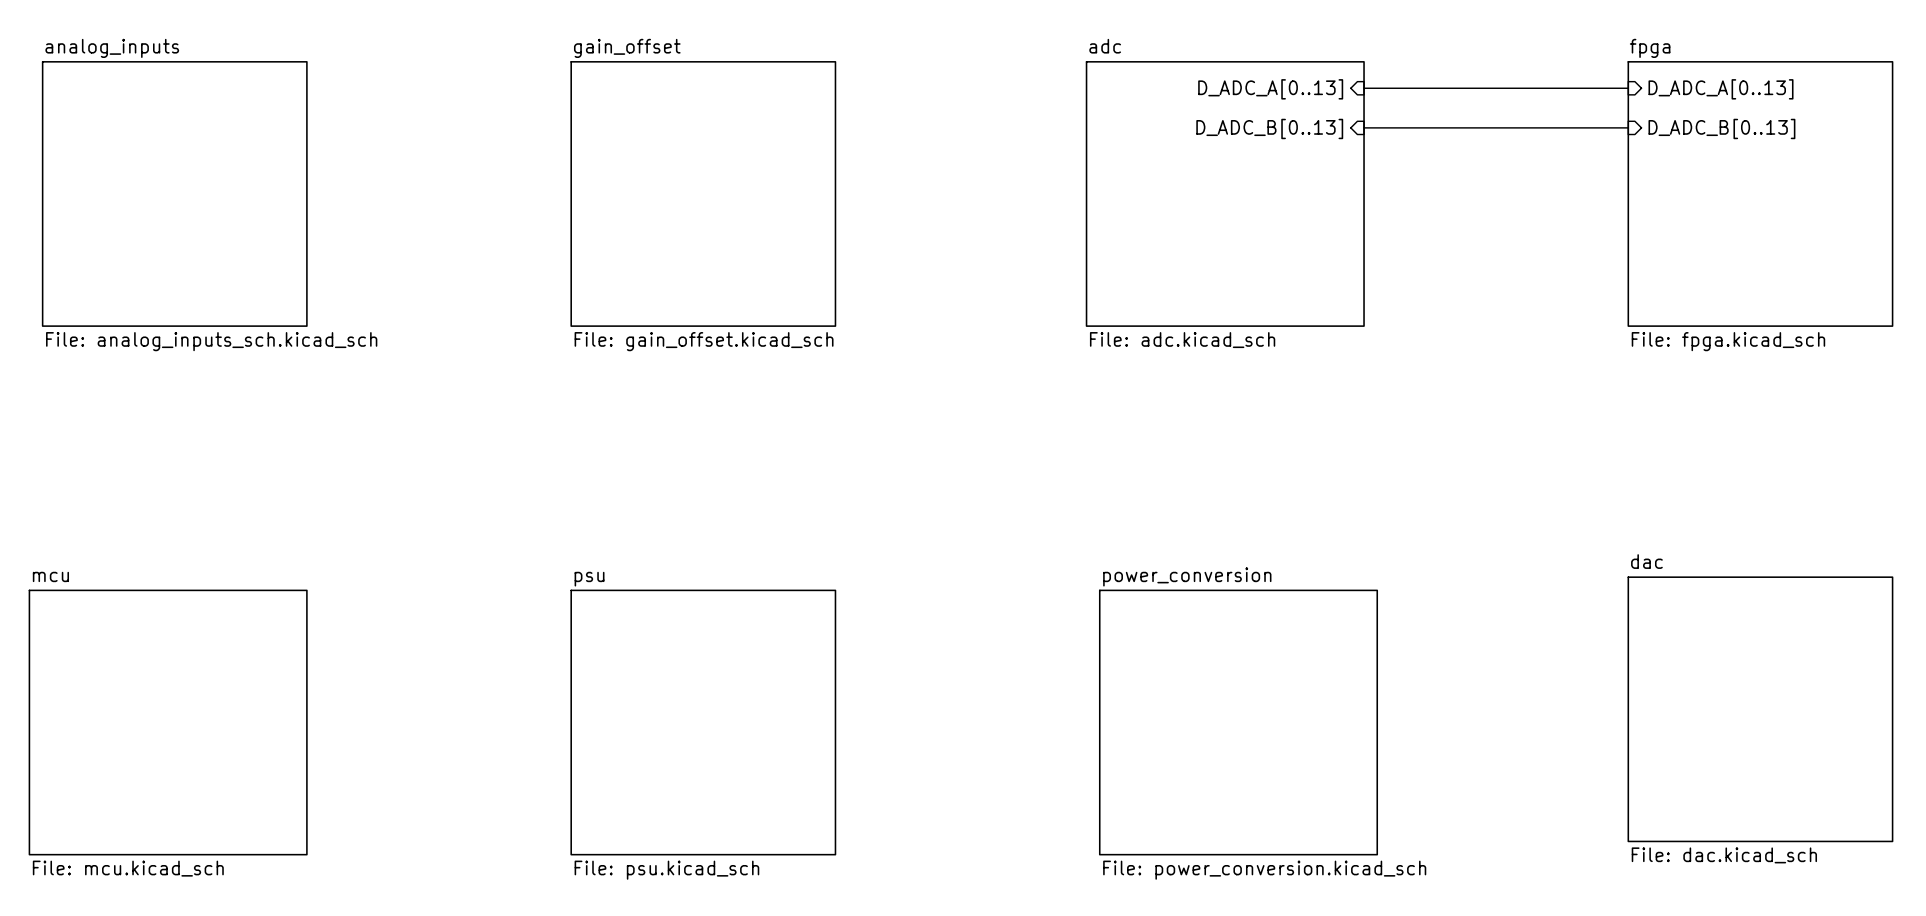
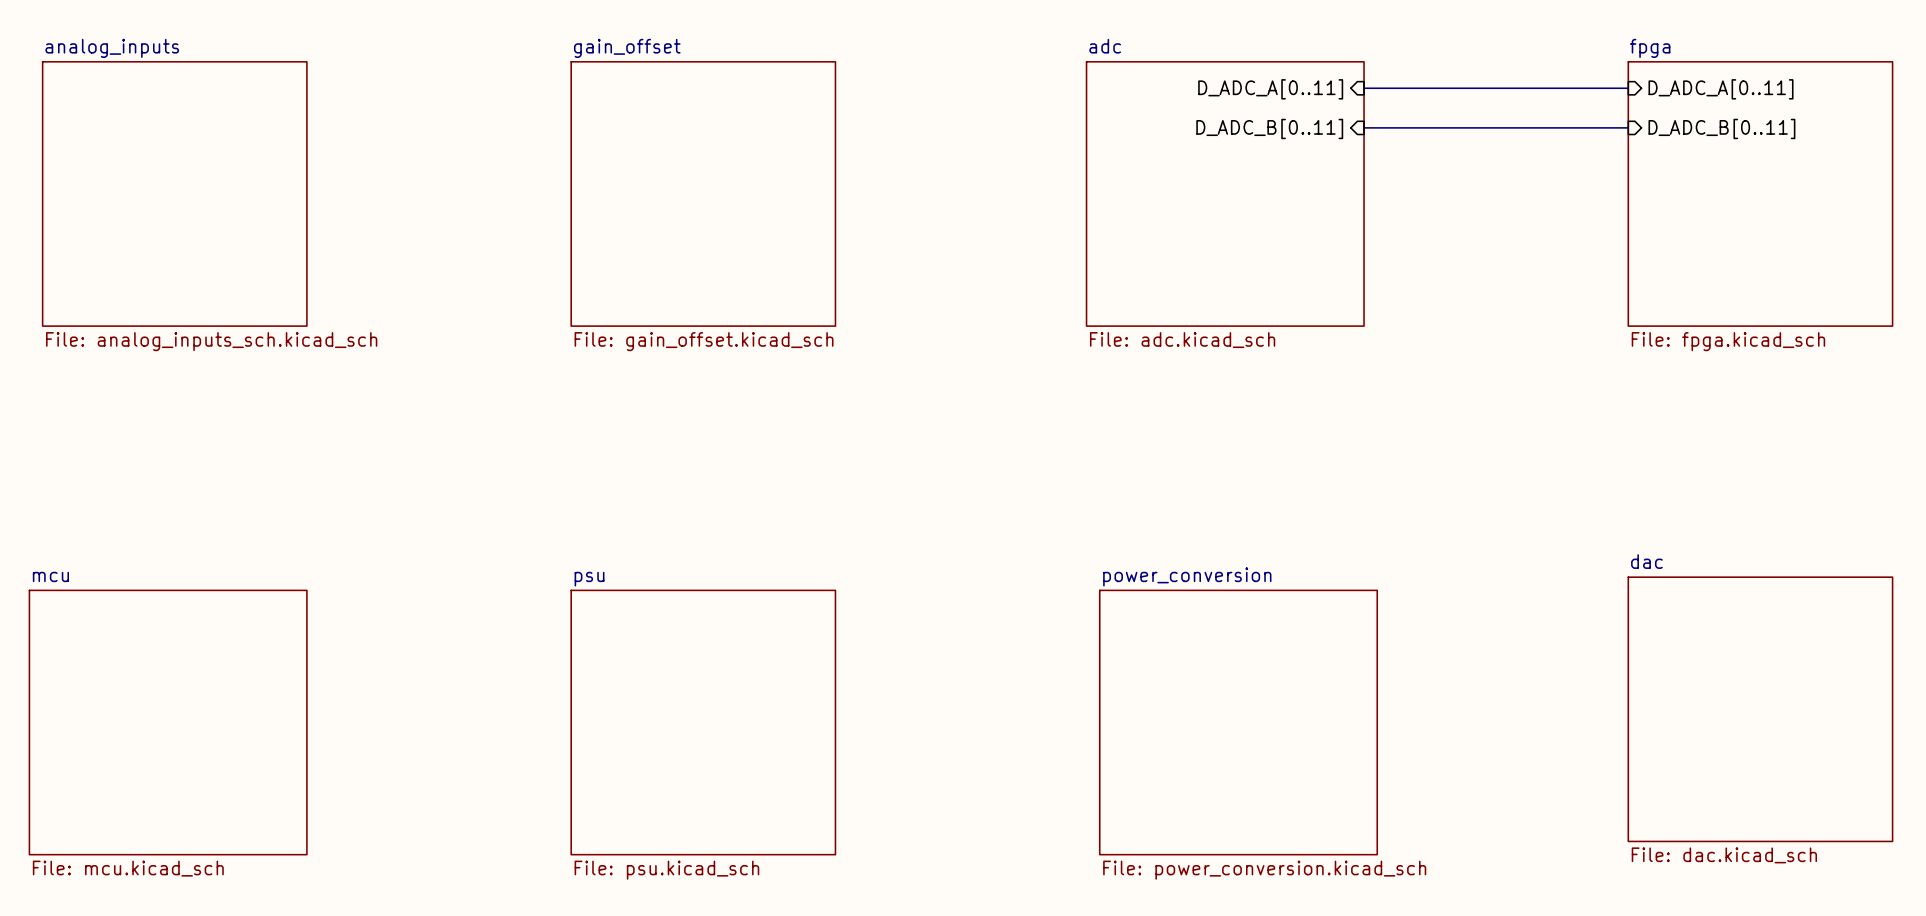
sheet pin: D_ADC_A[0..13] (1270, 89) -> D_ADC_A[0..11] (1270, 89)
sheet pin: D_ADC_A[0..13] (1721, 89) -> D_ADC_A[0..11] (1721, 89)
sheet pin: D_ADC_B[0..13] (1269, 128) -> D_ADC_B[0..11] (1269, 128)
sheet pin: D_ADC_B[0..13] (1721, 128) -> D_ADC_B[0..11] (1721, 128)

